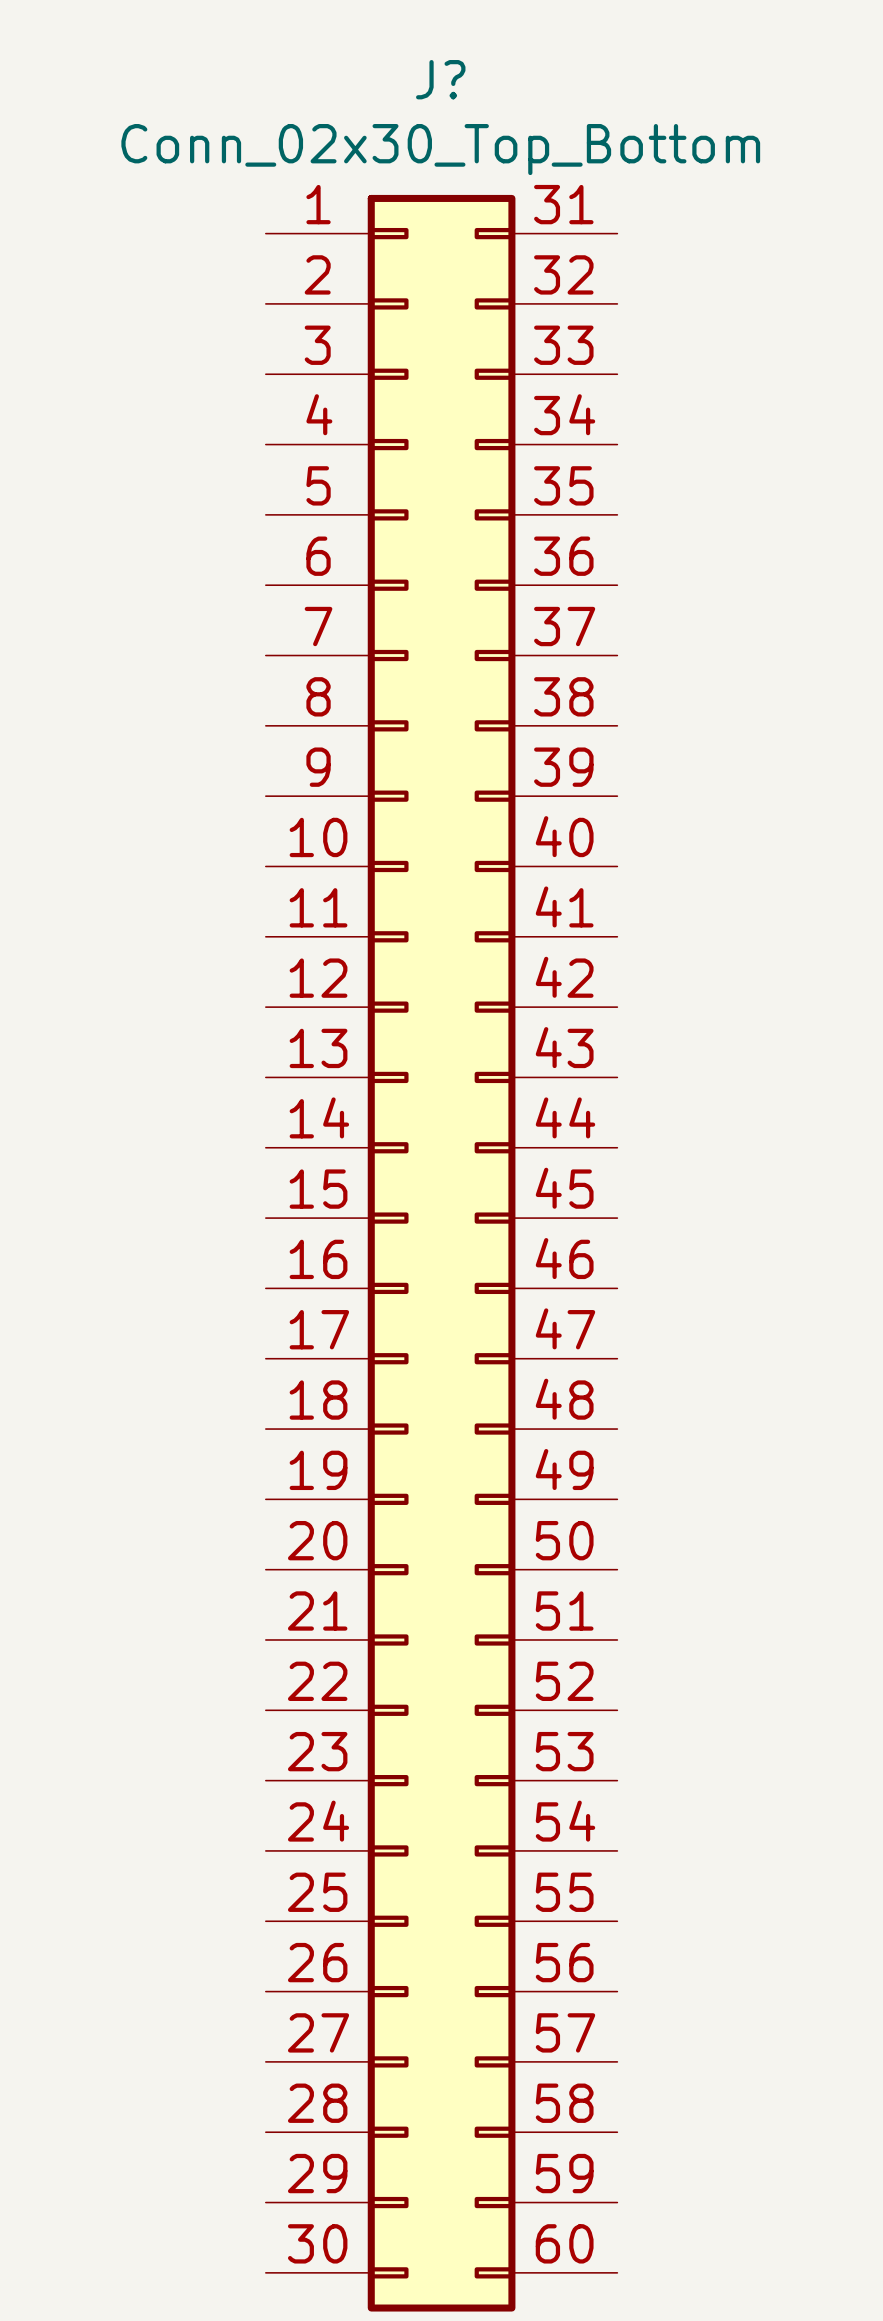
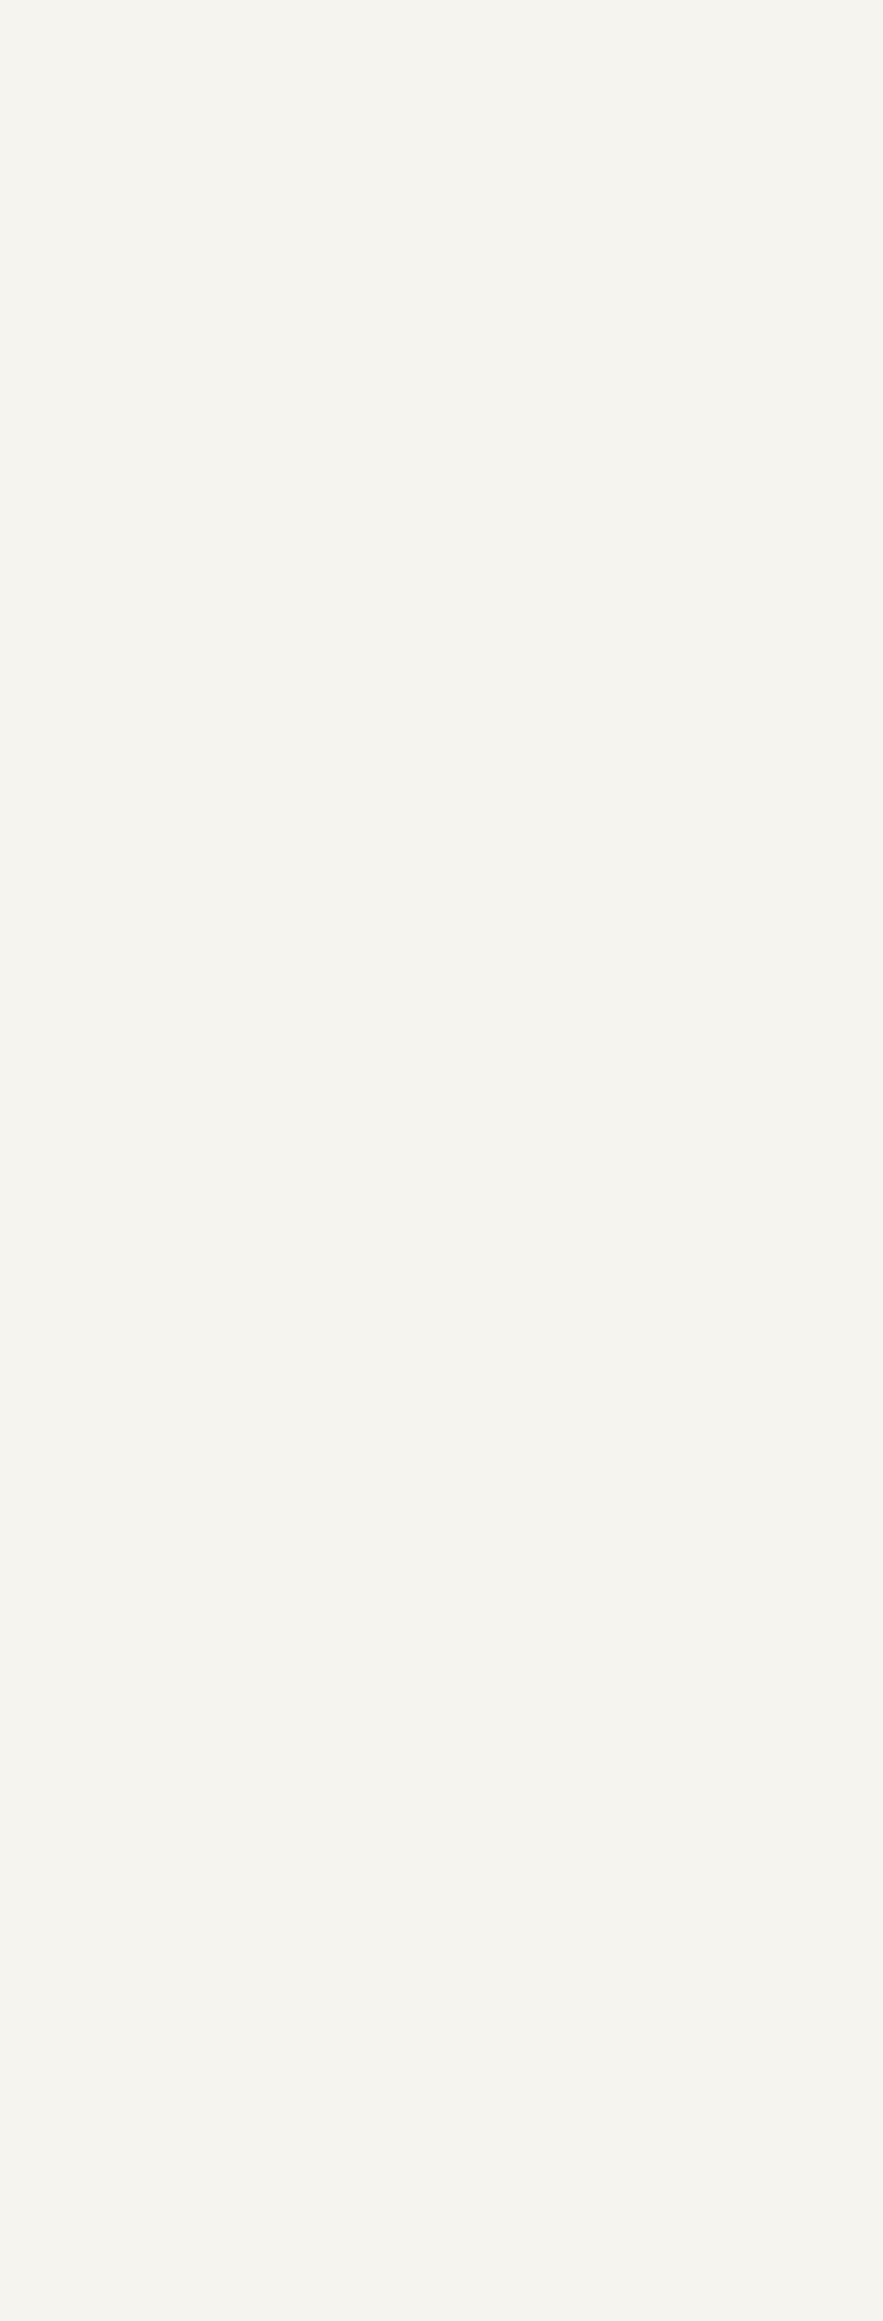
J?: Conn_02x30_Top_Bottom (441, 1253) -> none

